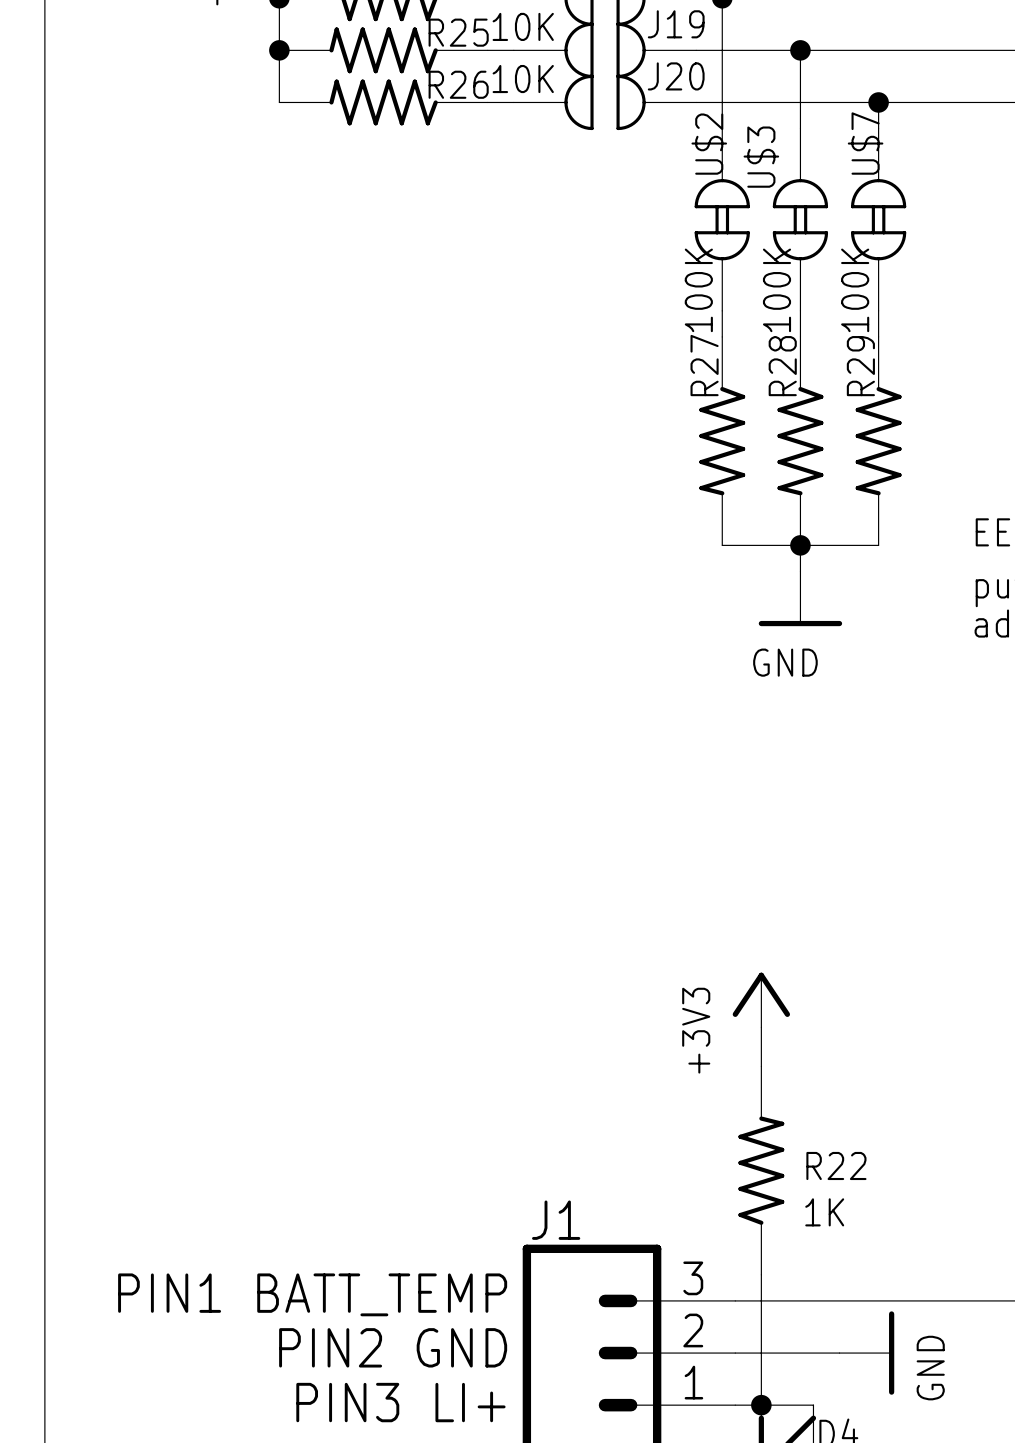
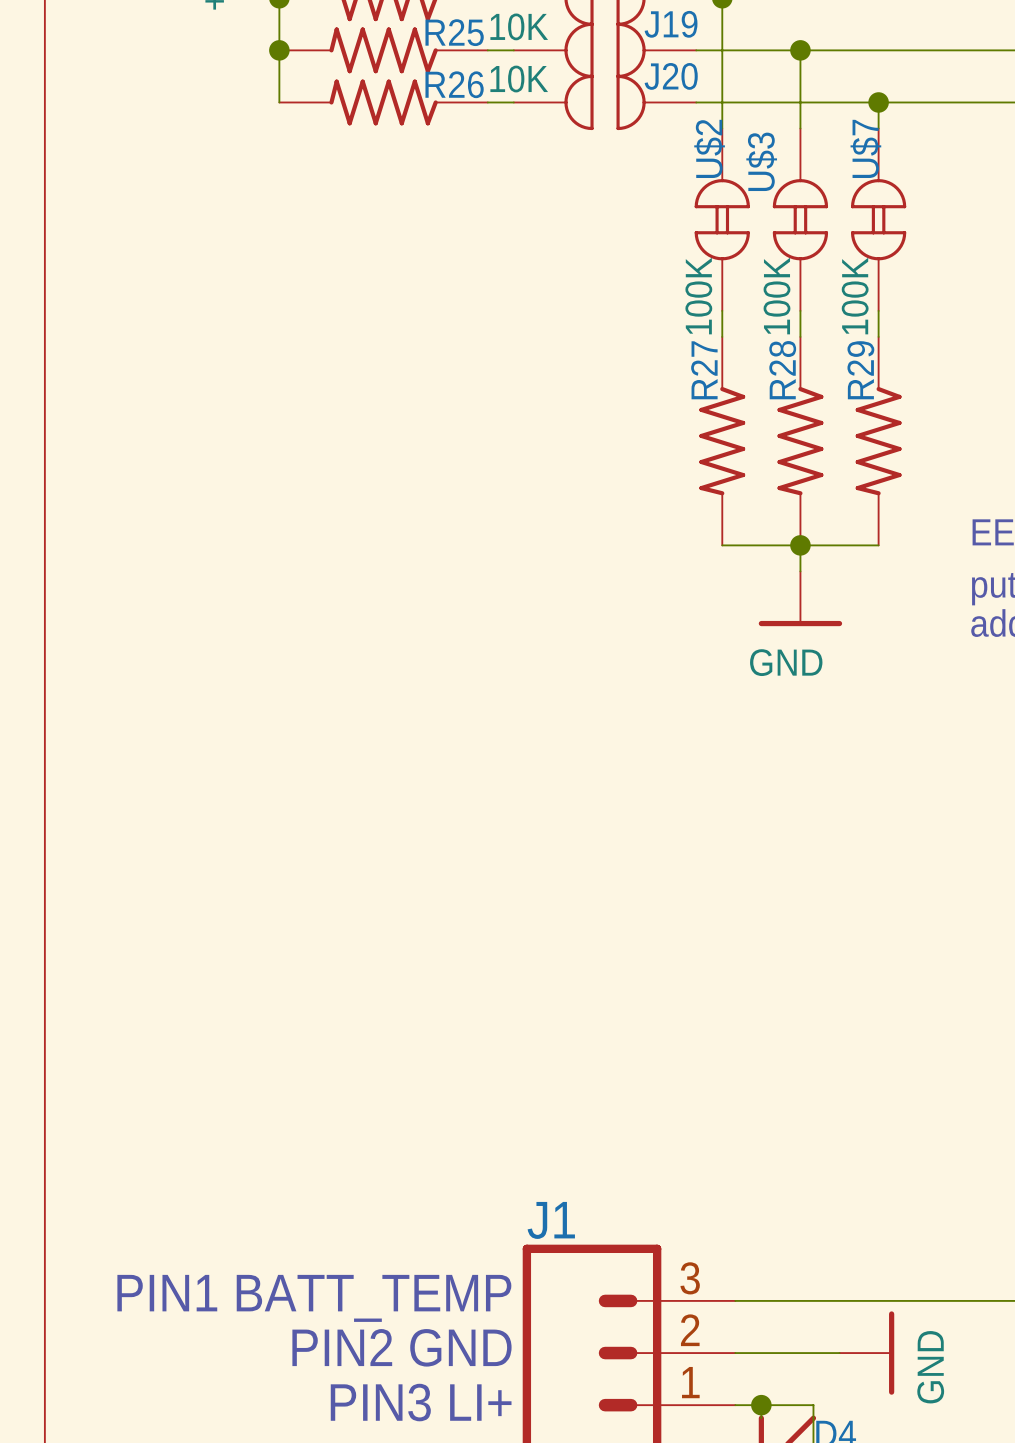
power symbol: +3V3 (761, 1000) -> none
wire: (761, 1027) (761, 1066) -> none
R22: 1K (761, 1170) -> none
wire: (761, 1274) (761, 1405) -> none

